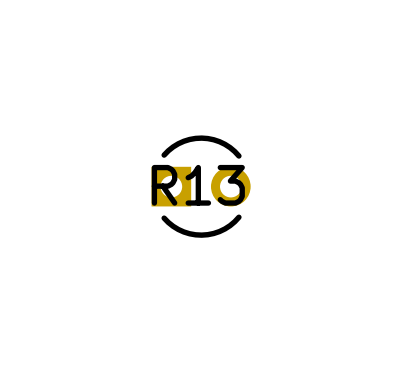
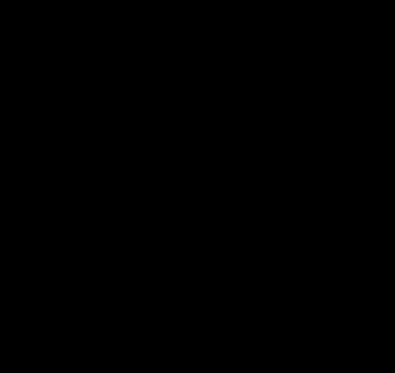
R13: (201, 186) -> none

